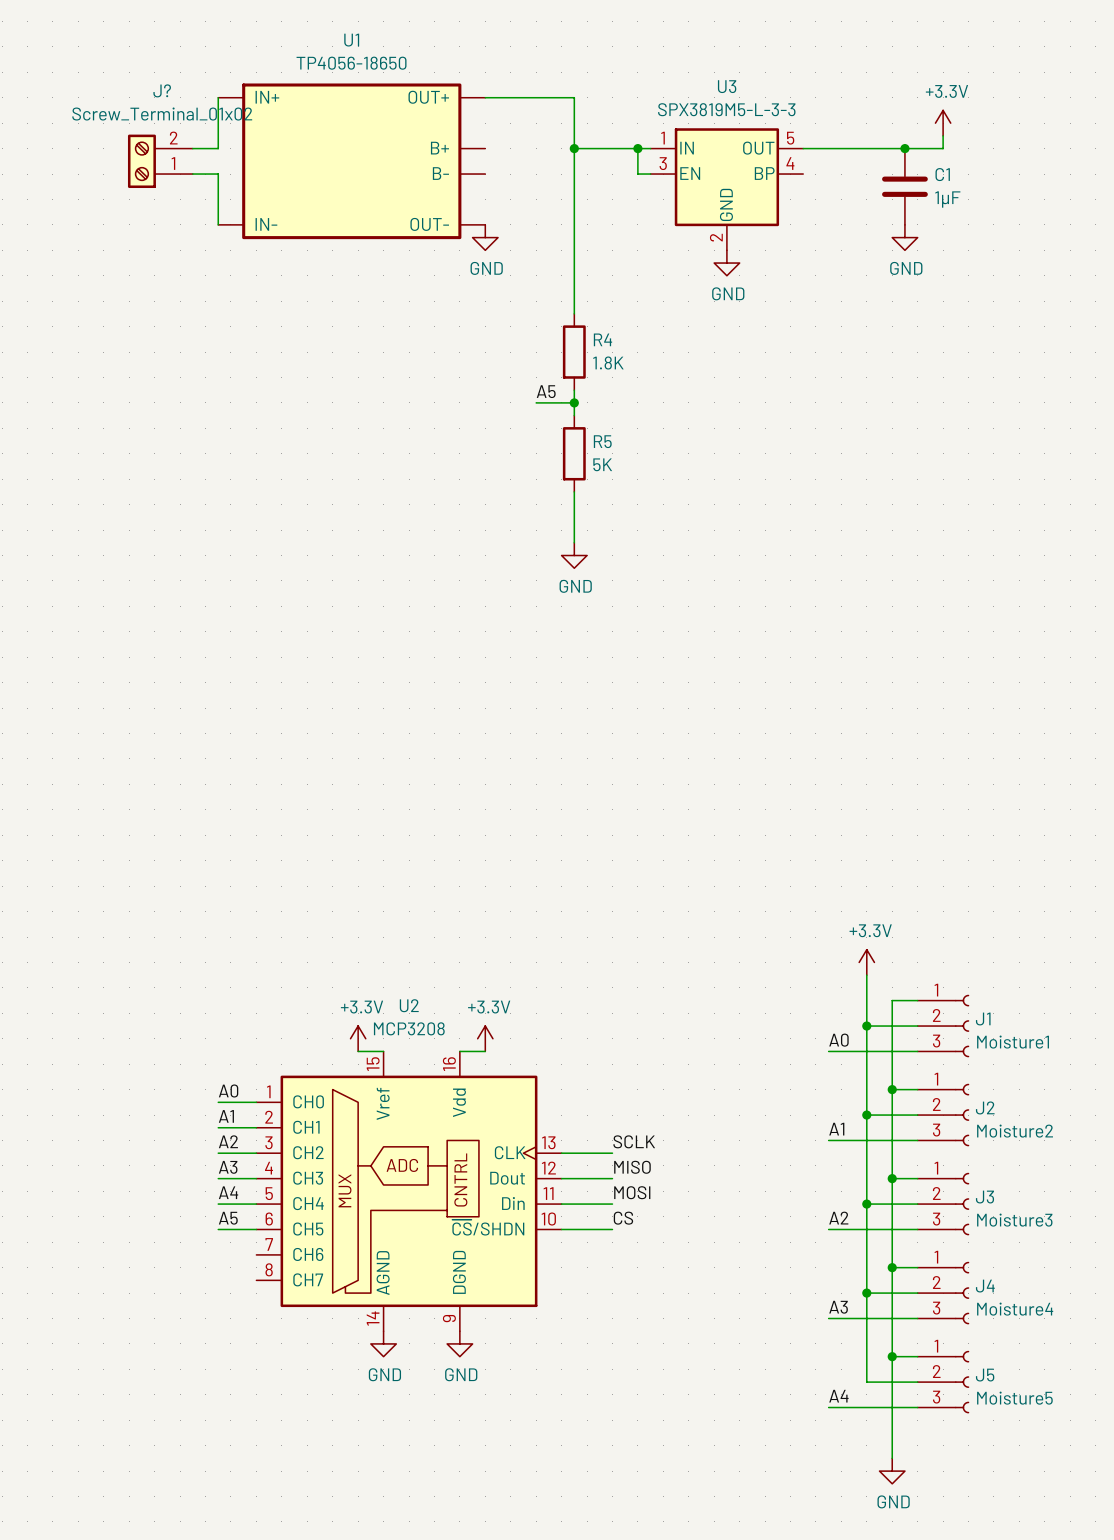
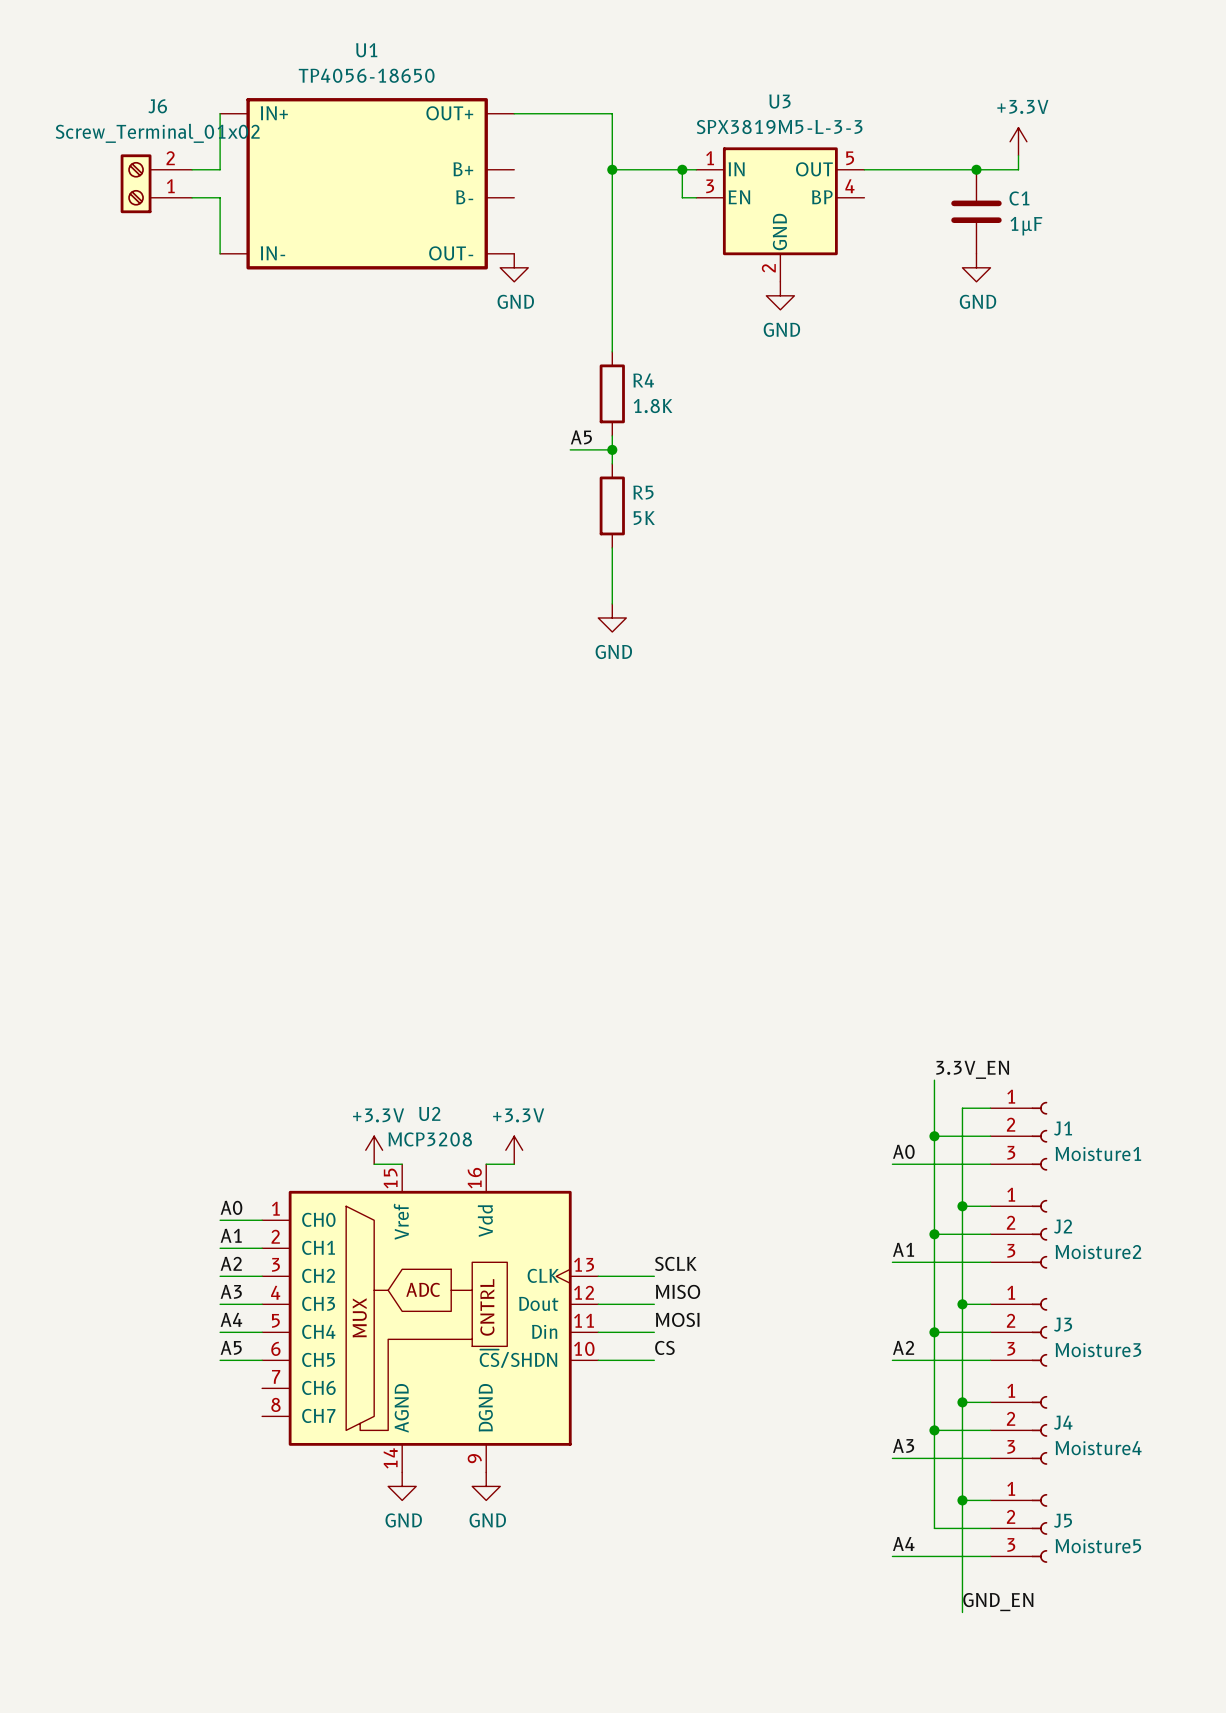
J? name: J? (162, 90) -> J6 (157, 106)
power symbol: +3.3V (866, 962) -> none
label: none -> 3.3V_EN (972, 1069)
label: none -> GND_EN (998, 1602)
power symbol: GND (892, 1471) -> none

